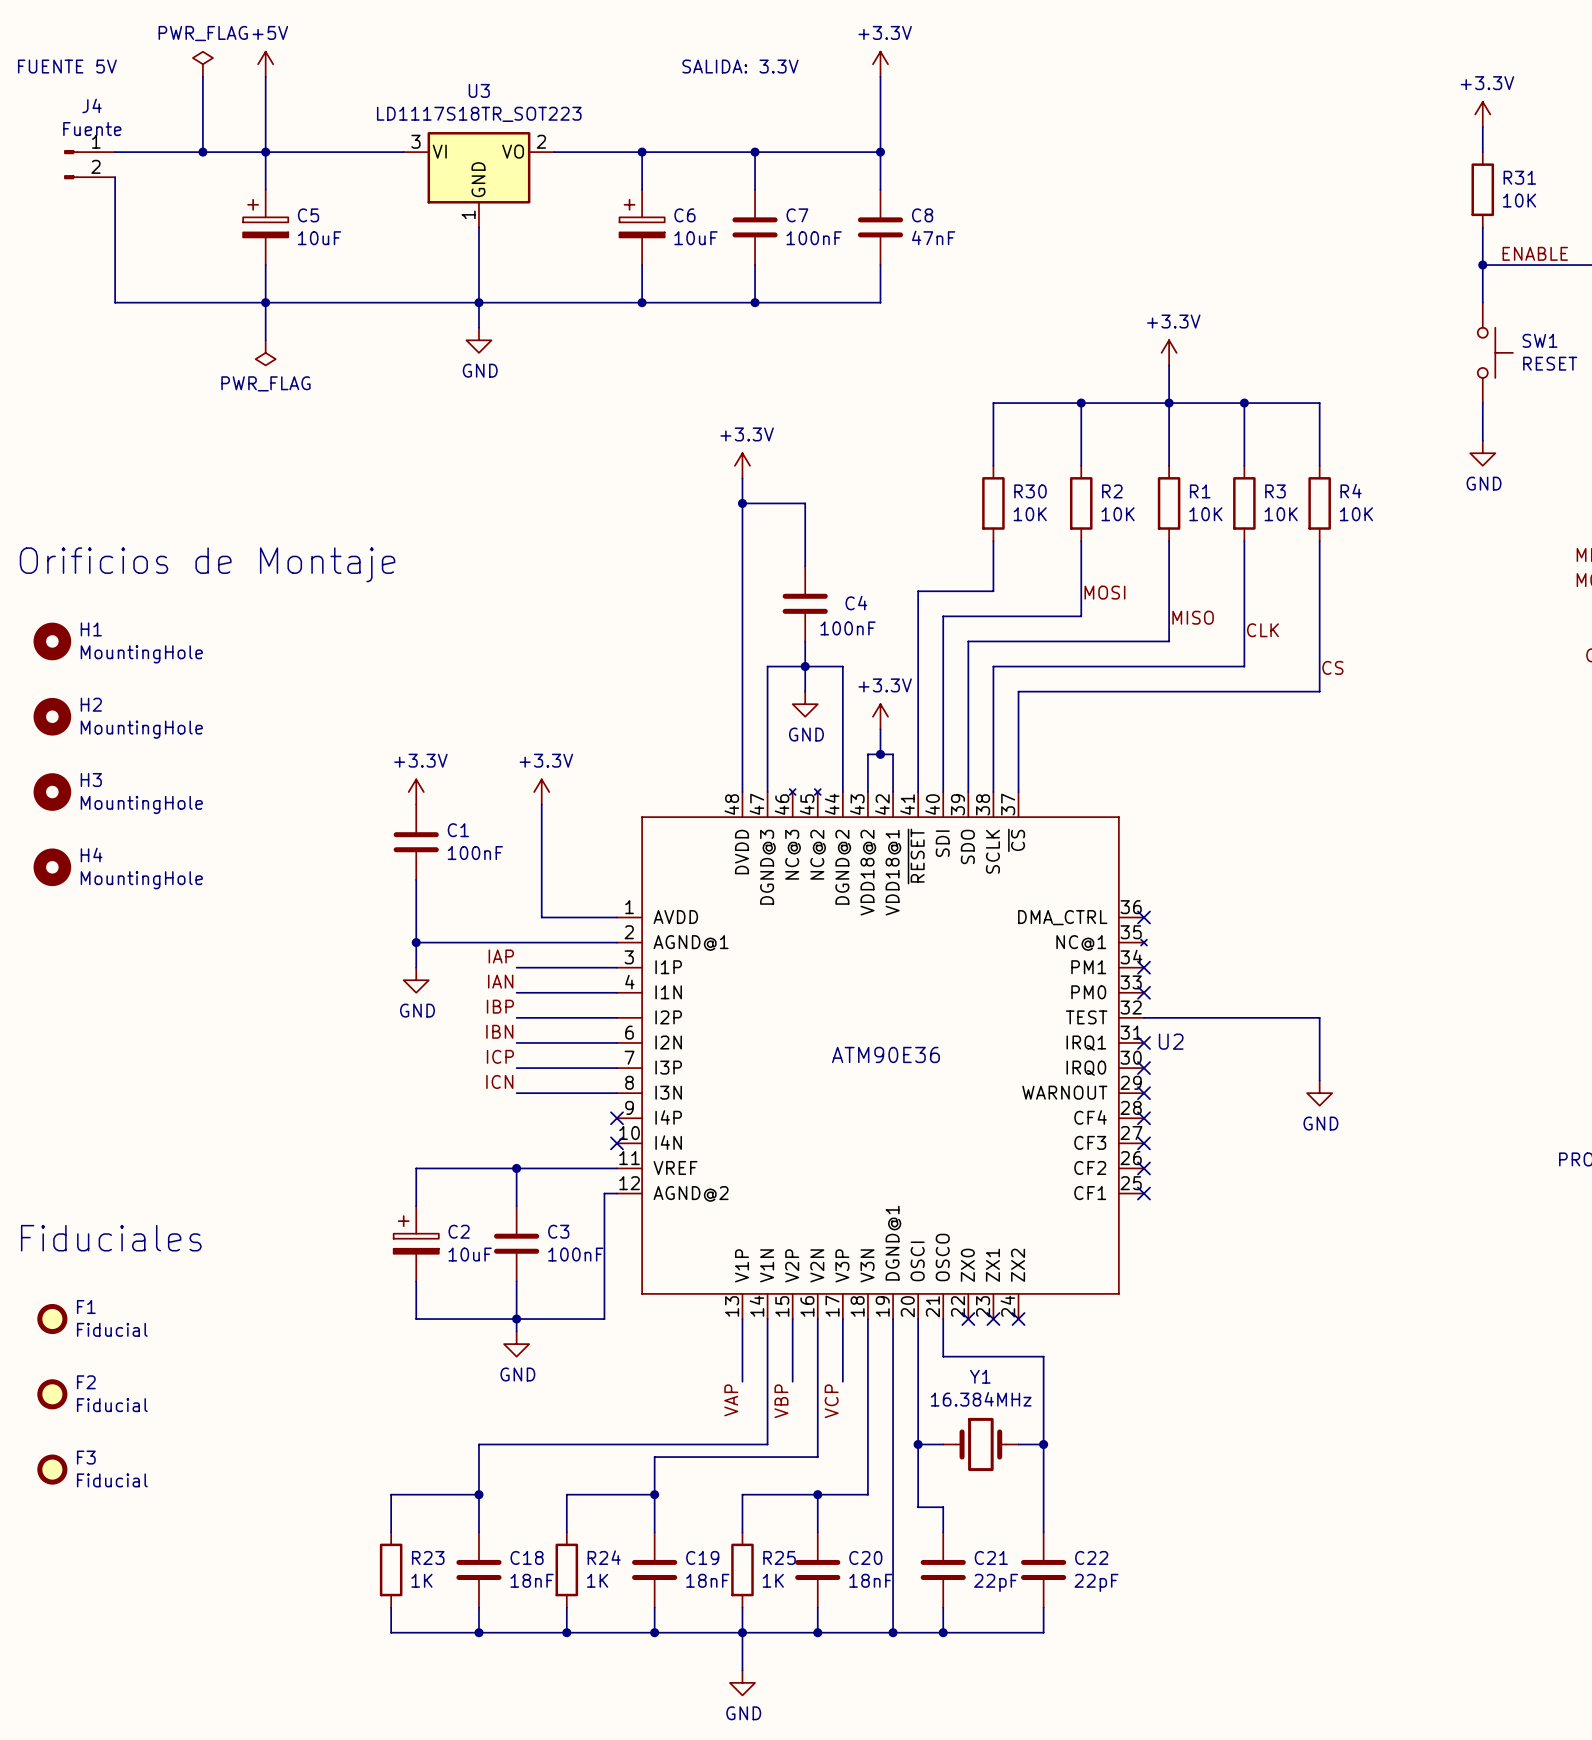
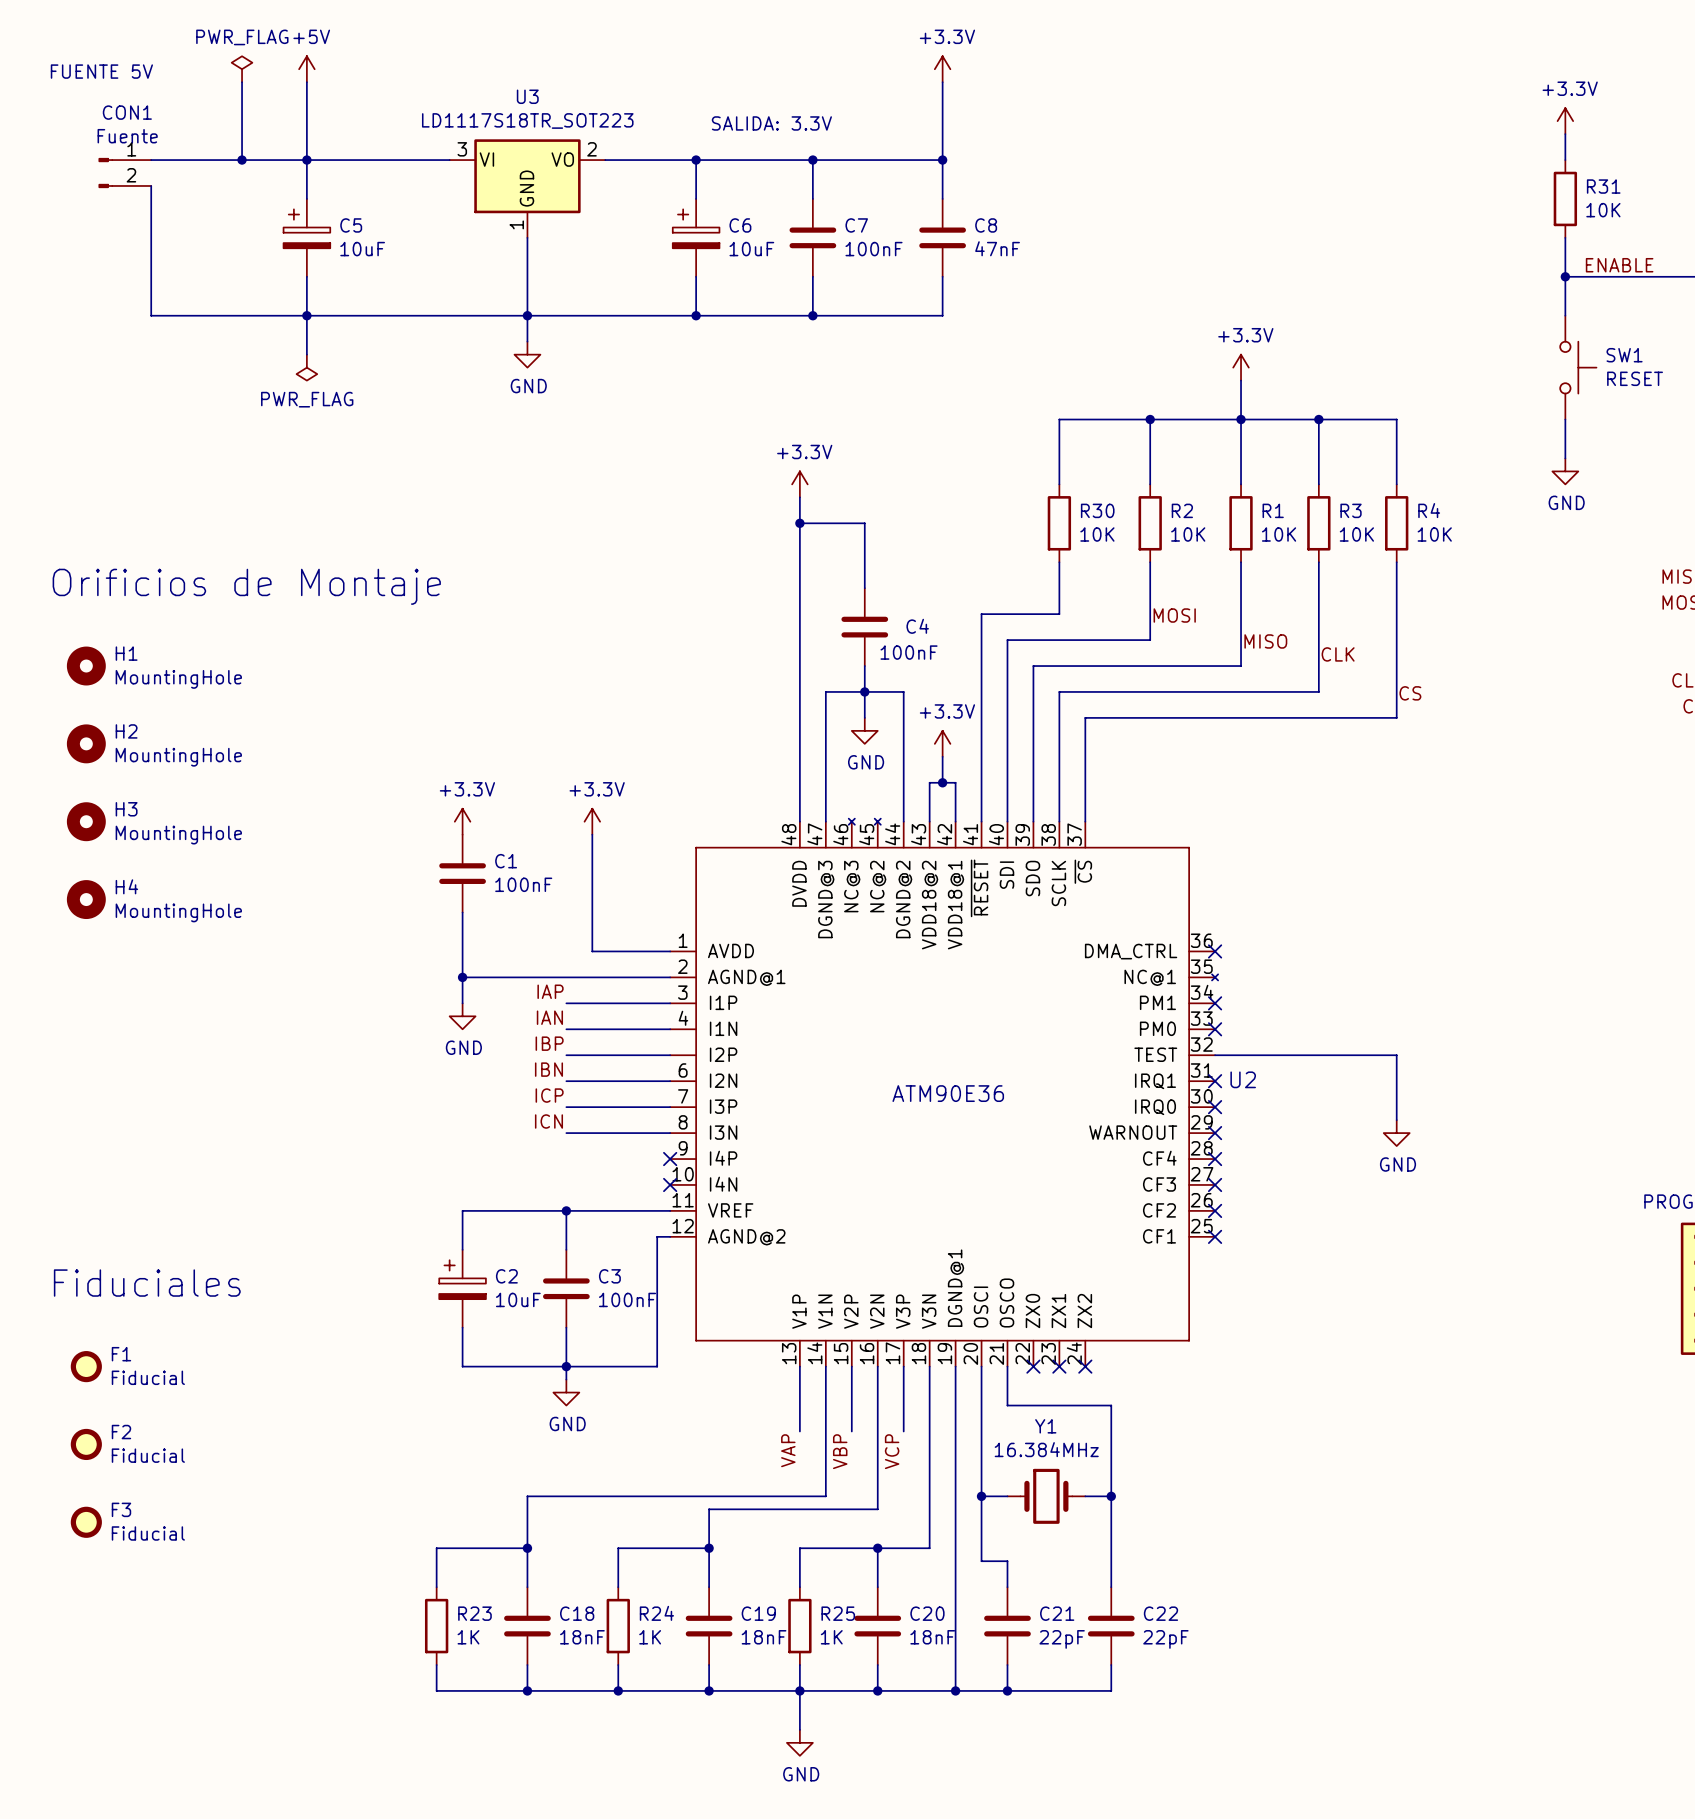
text position: SALIDA: 3.3V (740, 66) -> SALIDA: 3.3V (771, 123)
J4 name: J4 (92, 105) -> CON1 (127, 112)

